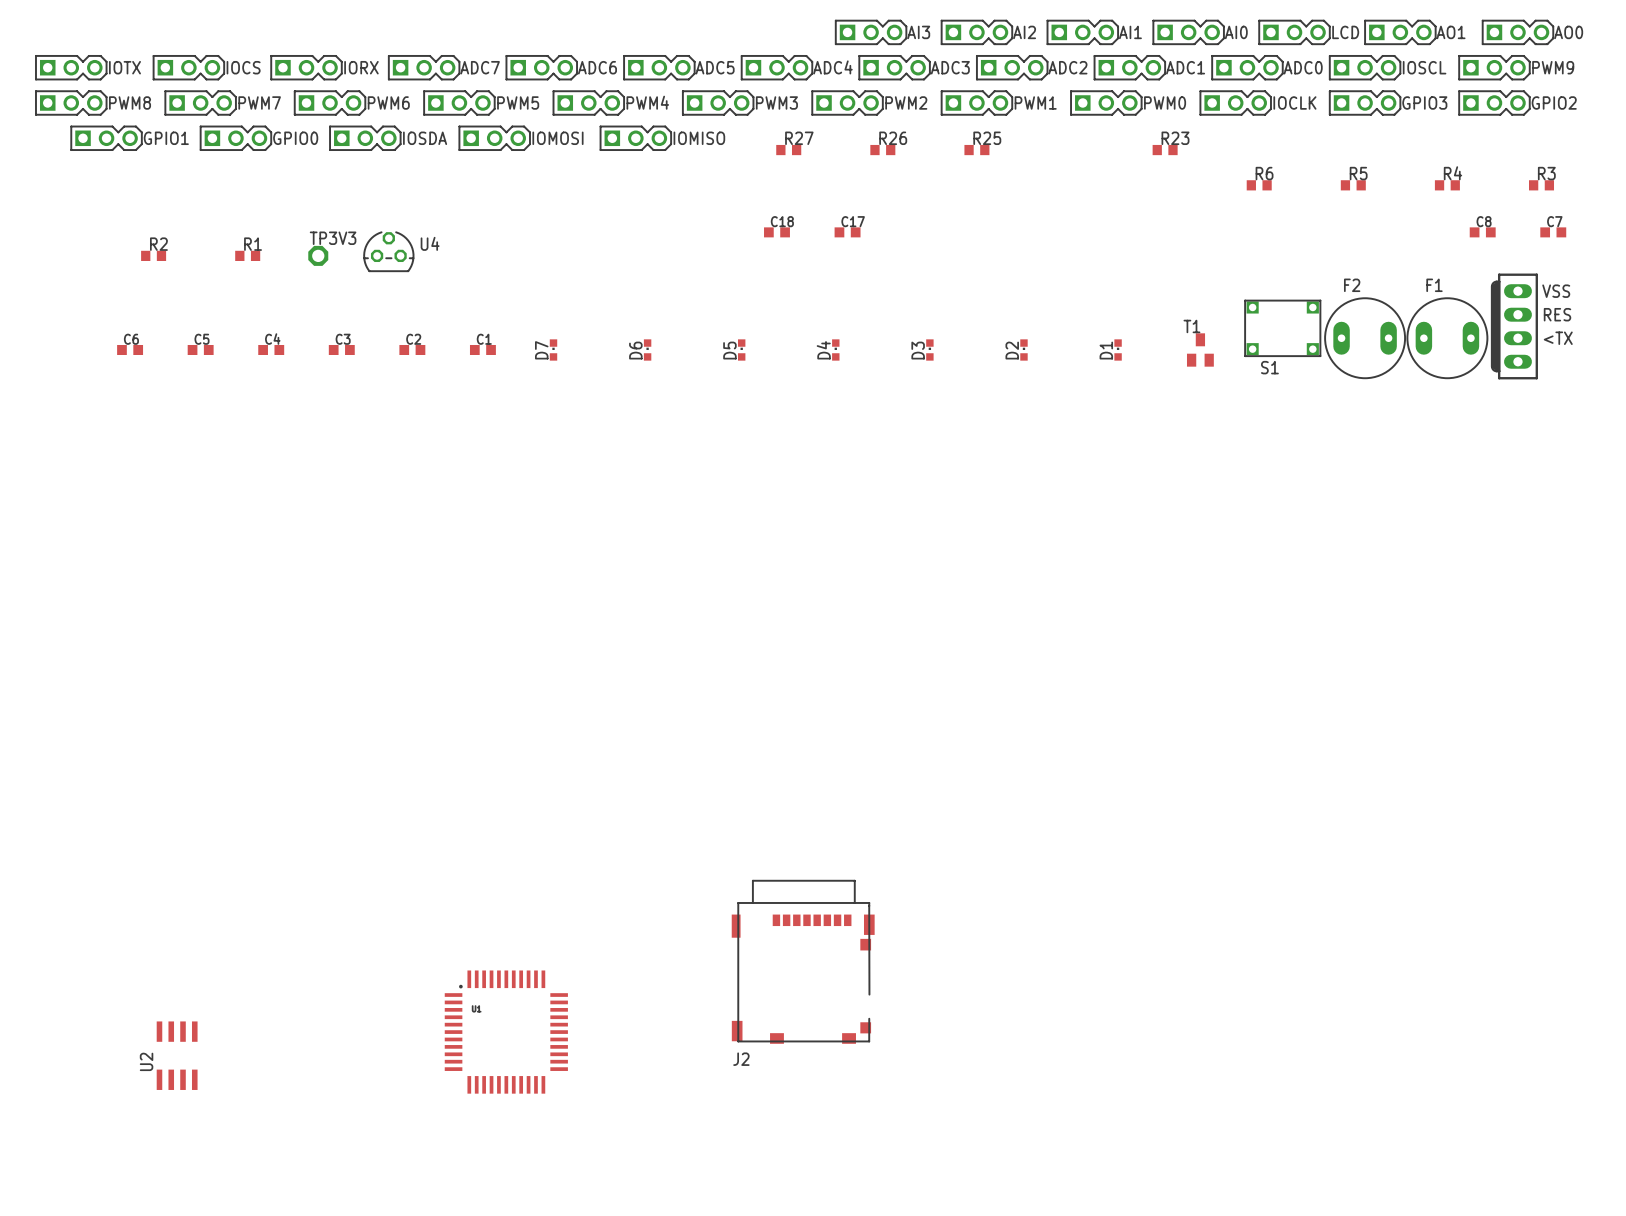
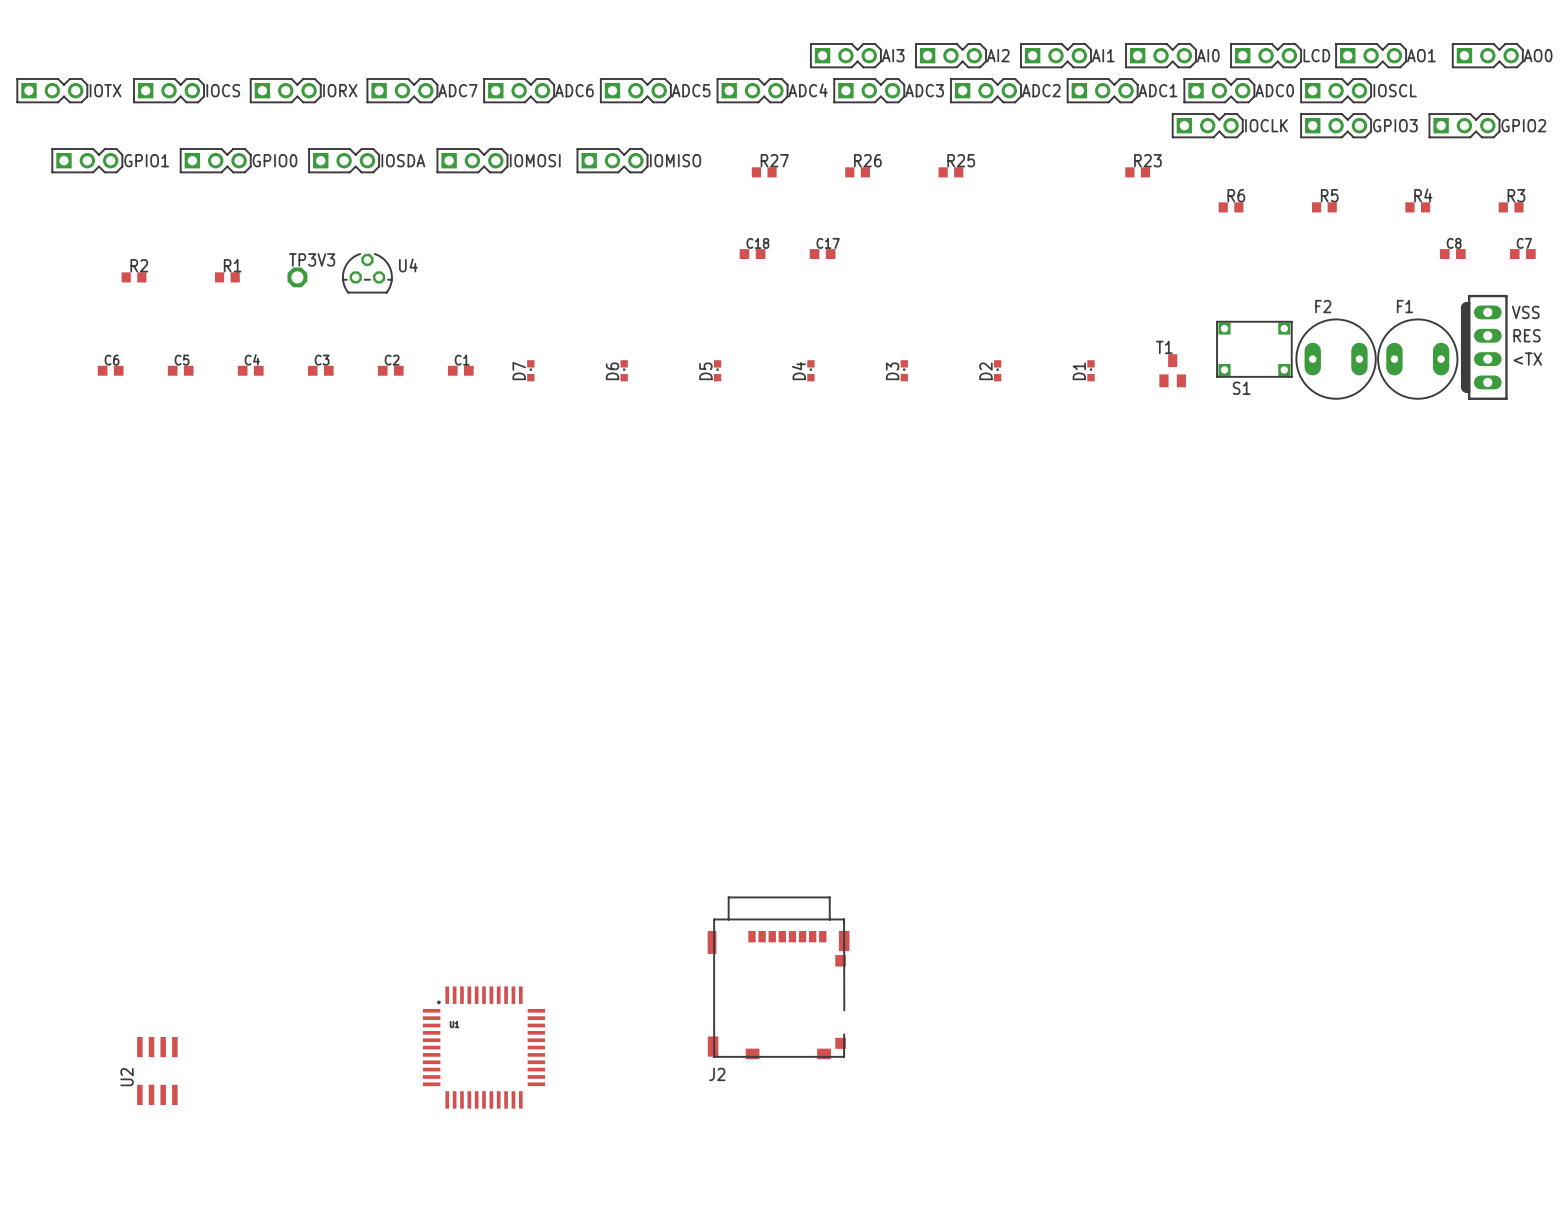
PWM9: (1494, 67) -> none
PWM8: (71, 102) -> none
PWM7: (200, 102) -> none
PWM6: (330, 102) -> none
PWM5: (459, 102) -> none
PWM4: (588, 102) -> none
PWM3: (718, 102) -> none
PWM2: (847, 102) -> none
PWM1: (976, 102) -> none
PWM0: (1106, 102) -> none

